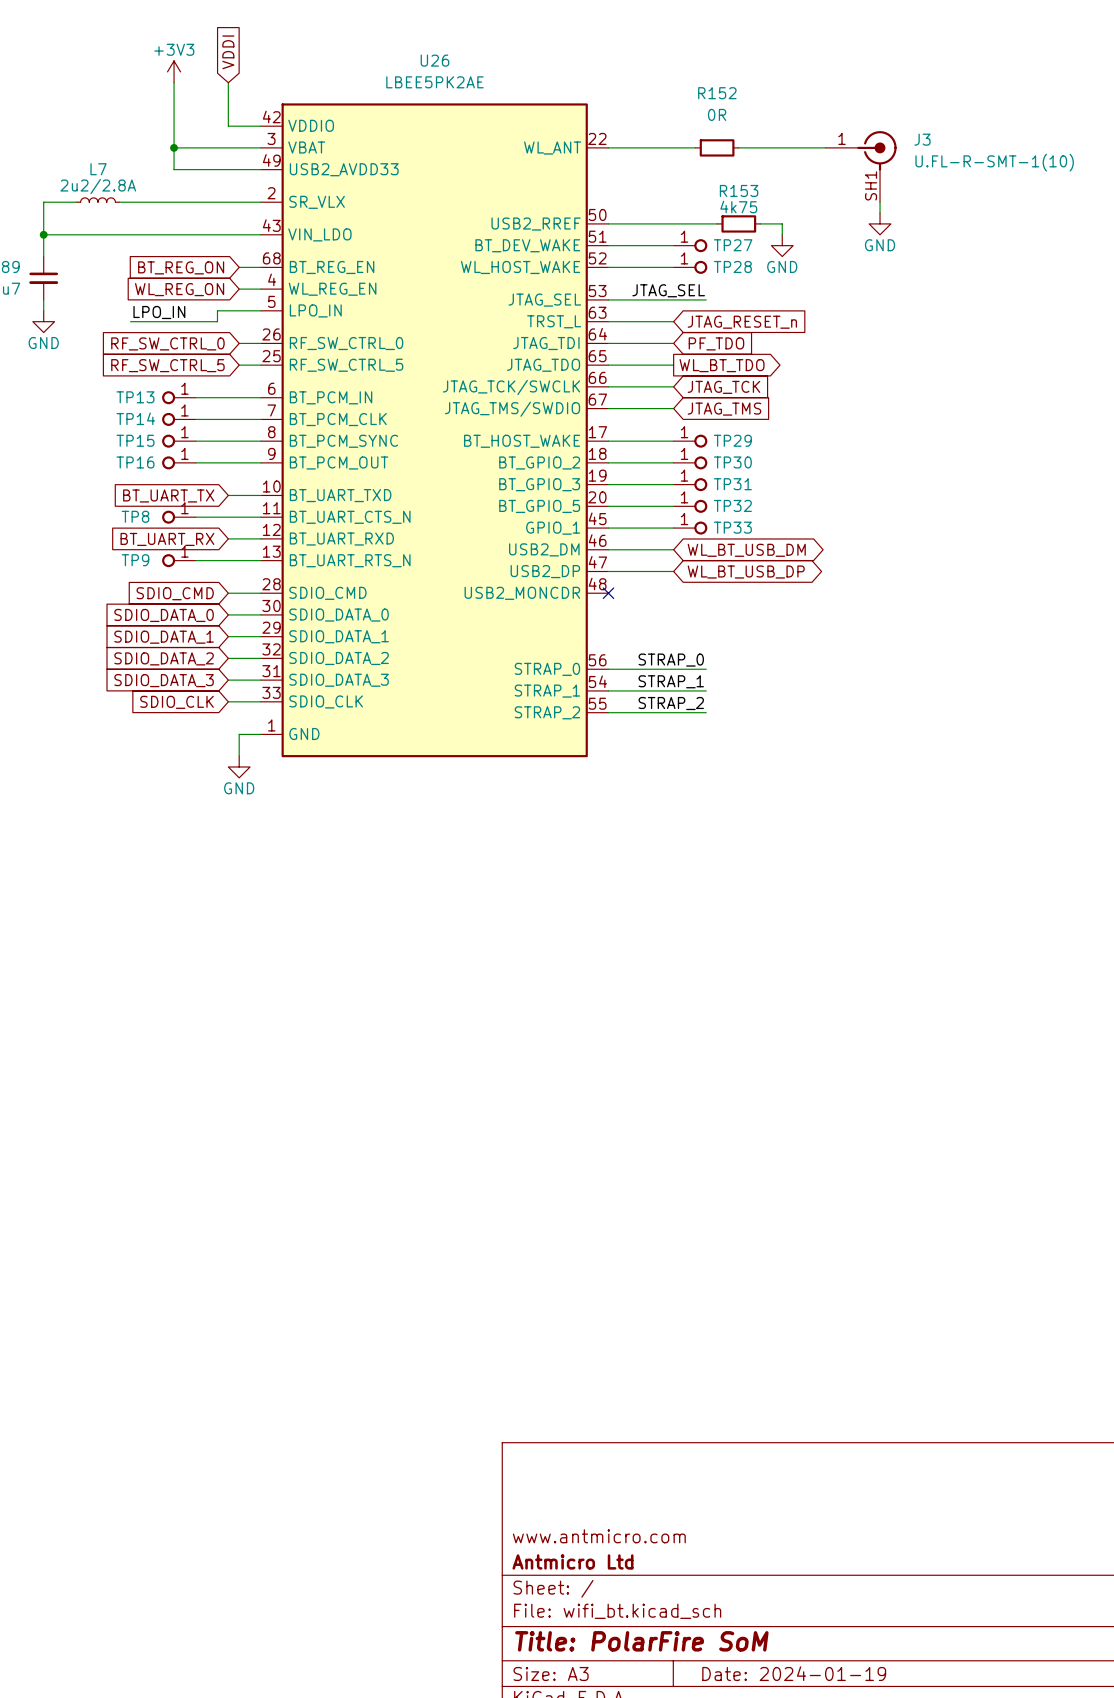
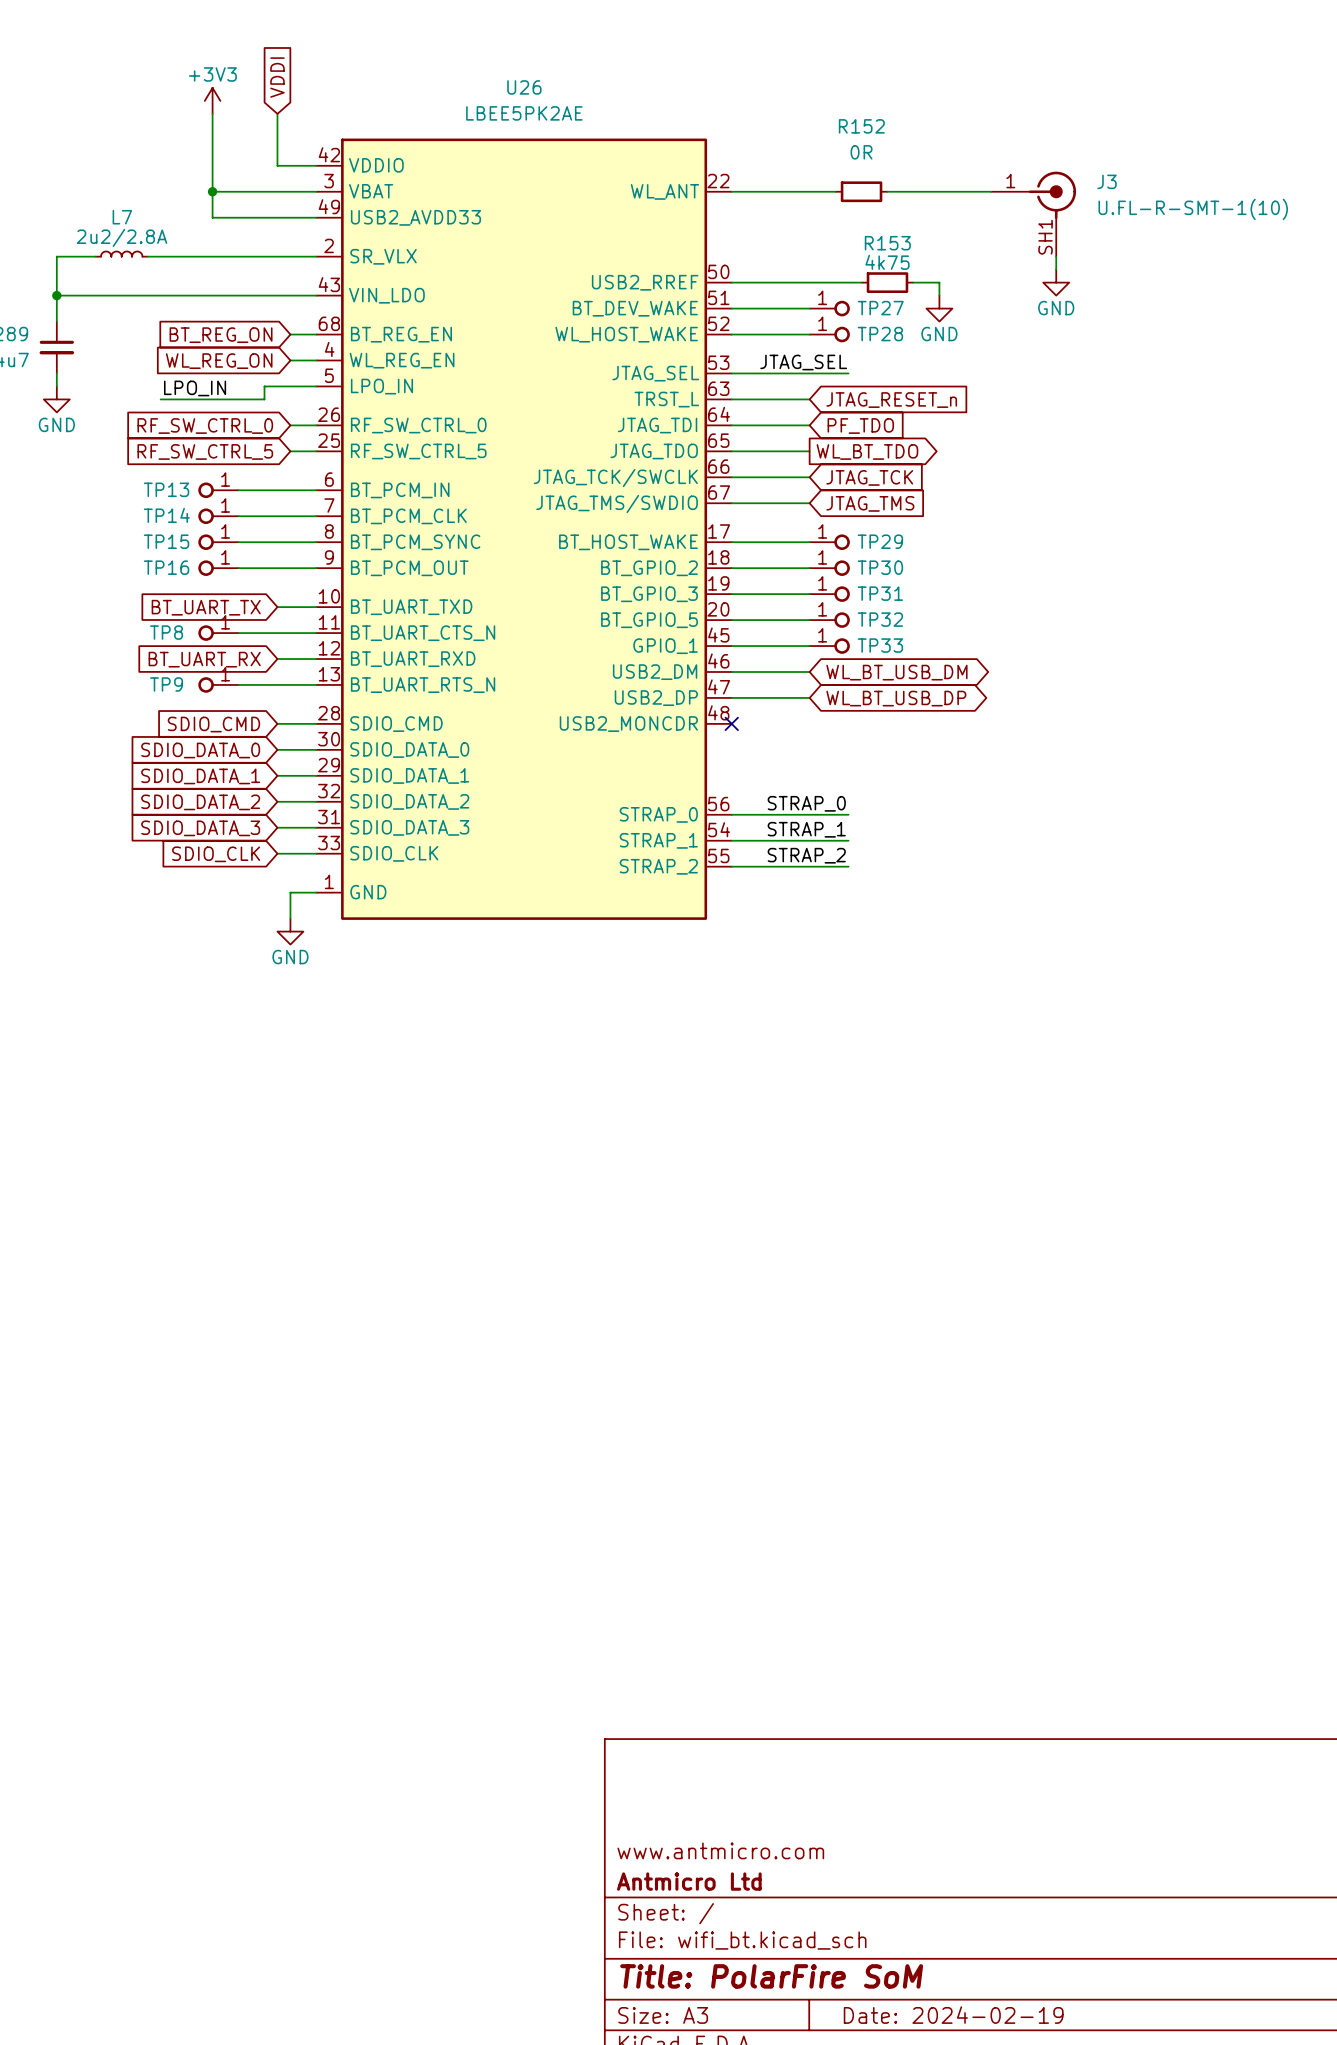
title block: Date: 2024-01-19 (794, 1673) -> Date: 2024-02-19 (953, 2015)

